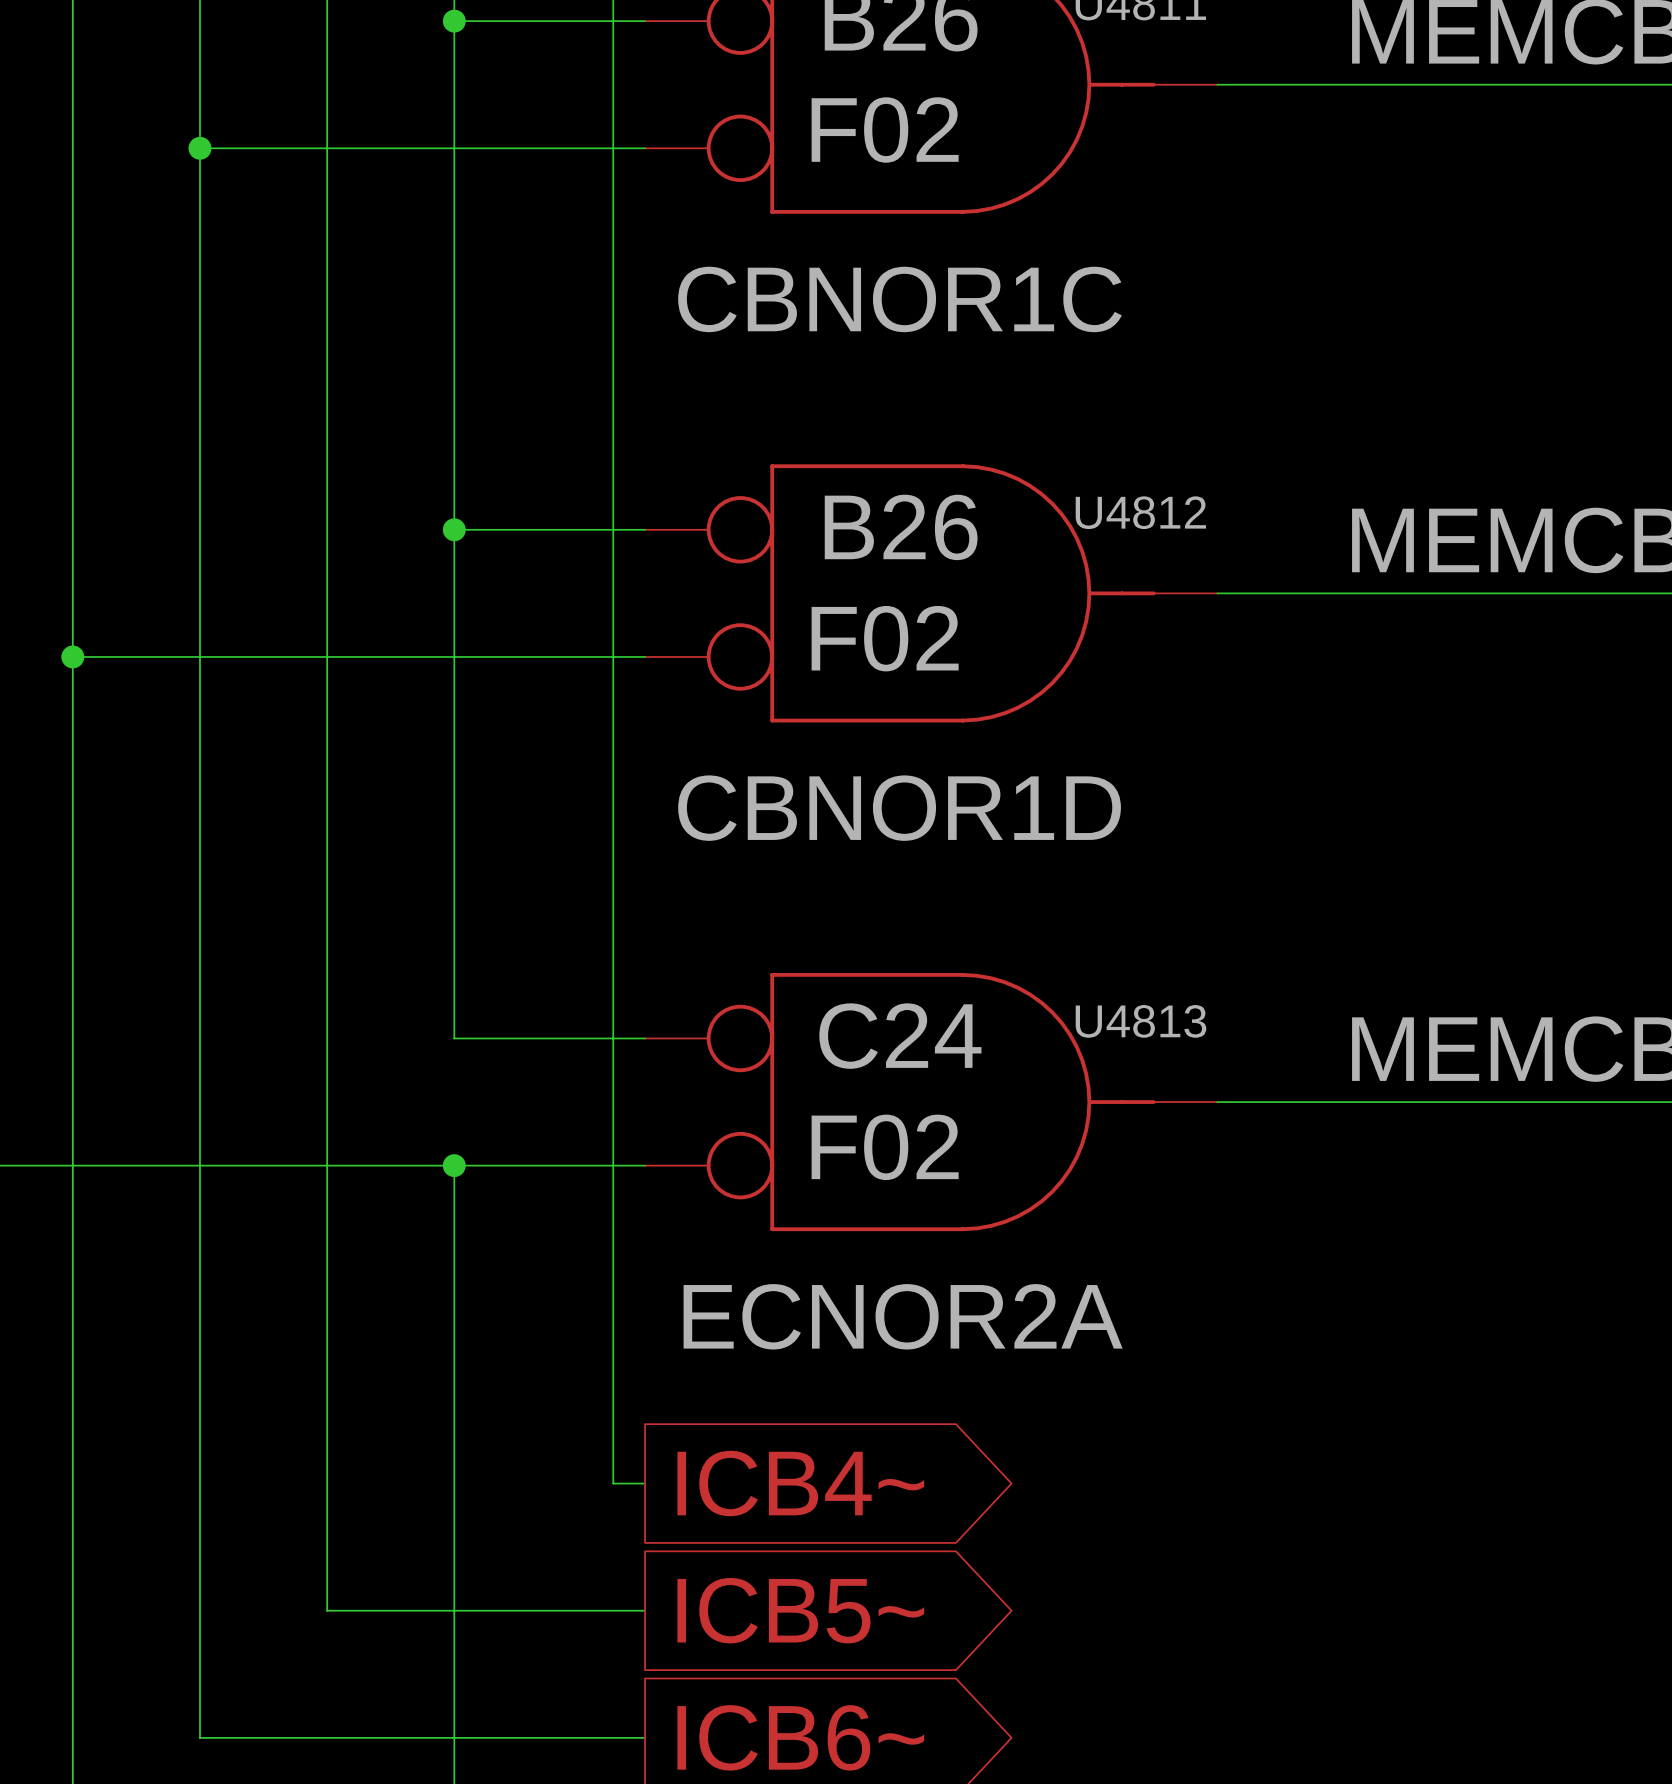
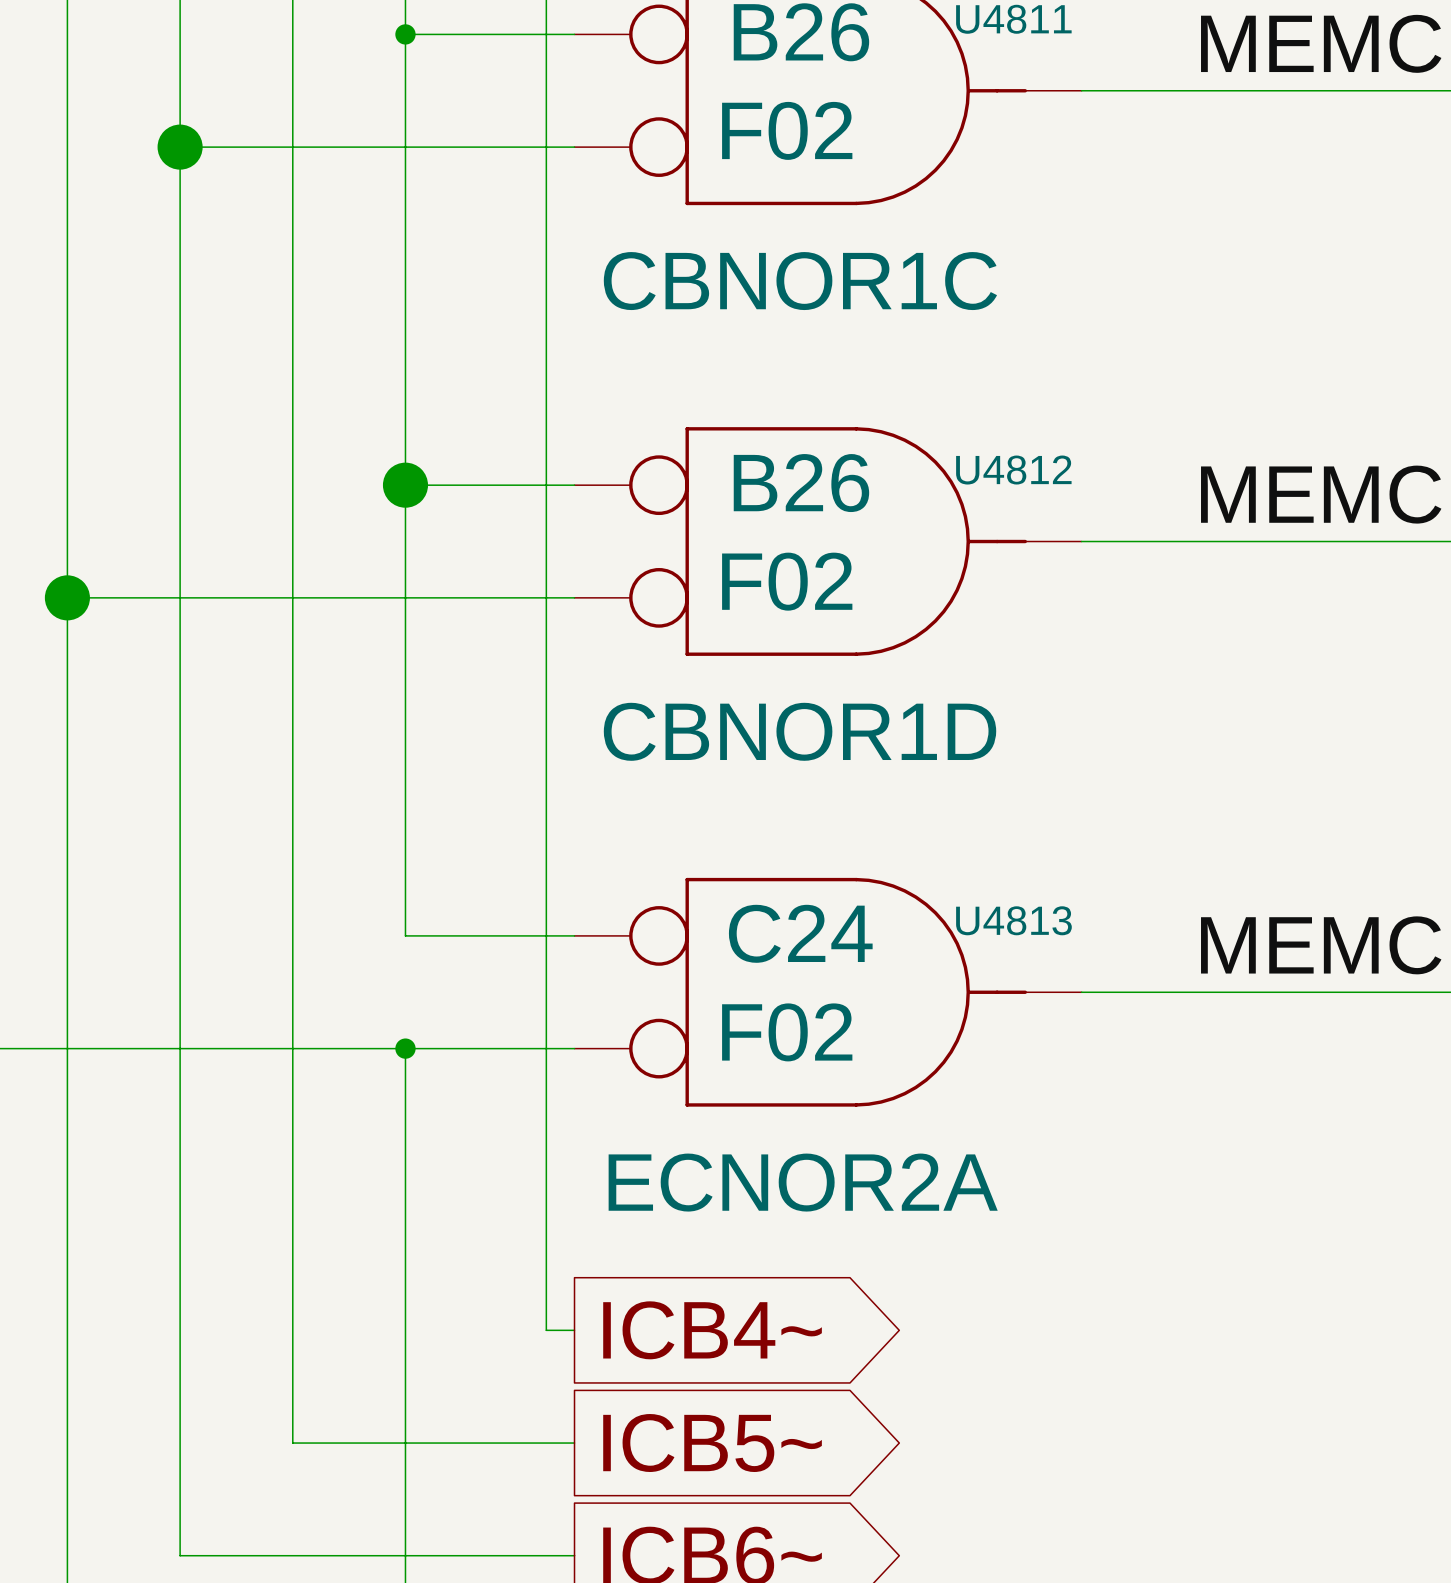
junction size: [188, 136, 212, 160] -> [157, 124, 203, 170]
junction size: [442, 518, 466, 542] -> [382, 462, 429, 508]
junction size: [61, 645, 85, 669] -> [44, 575, 90, 621]

